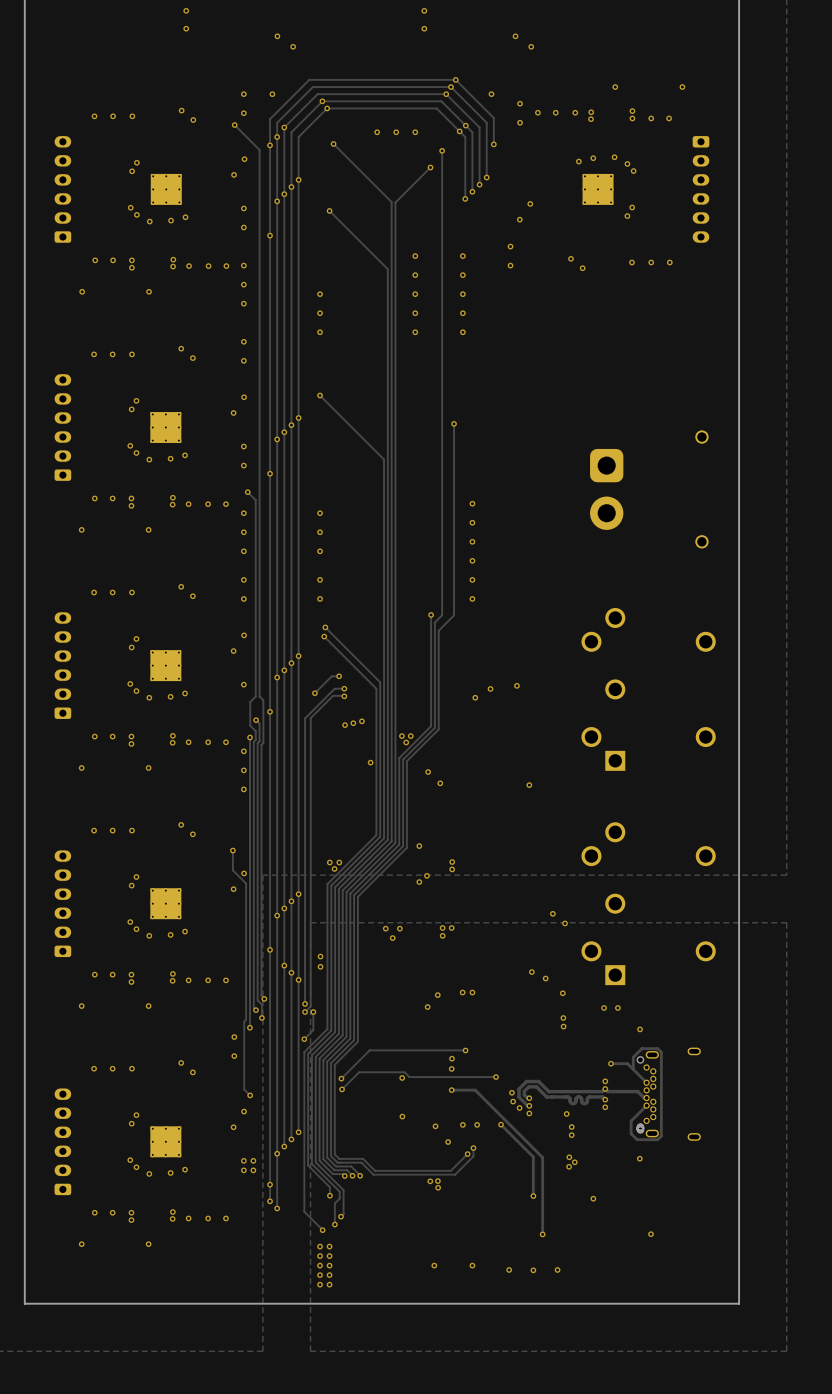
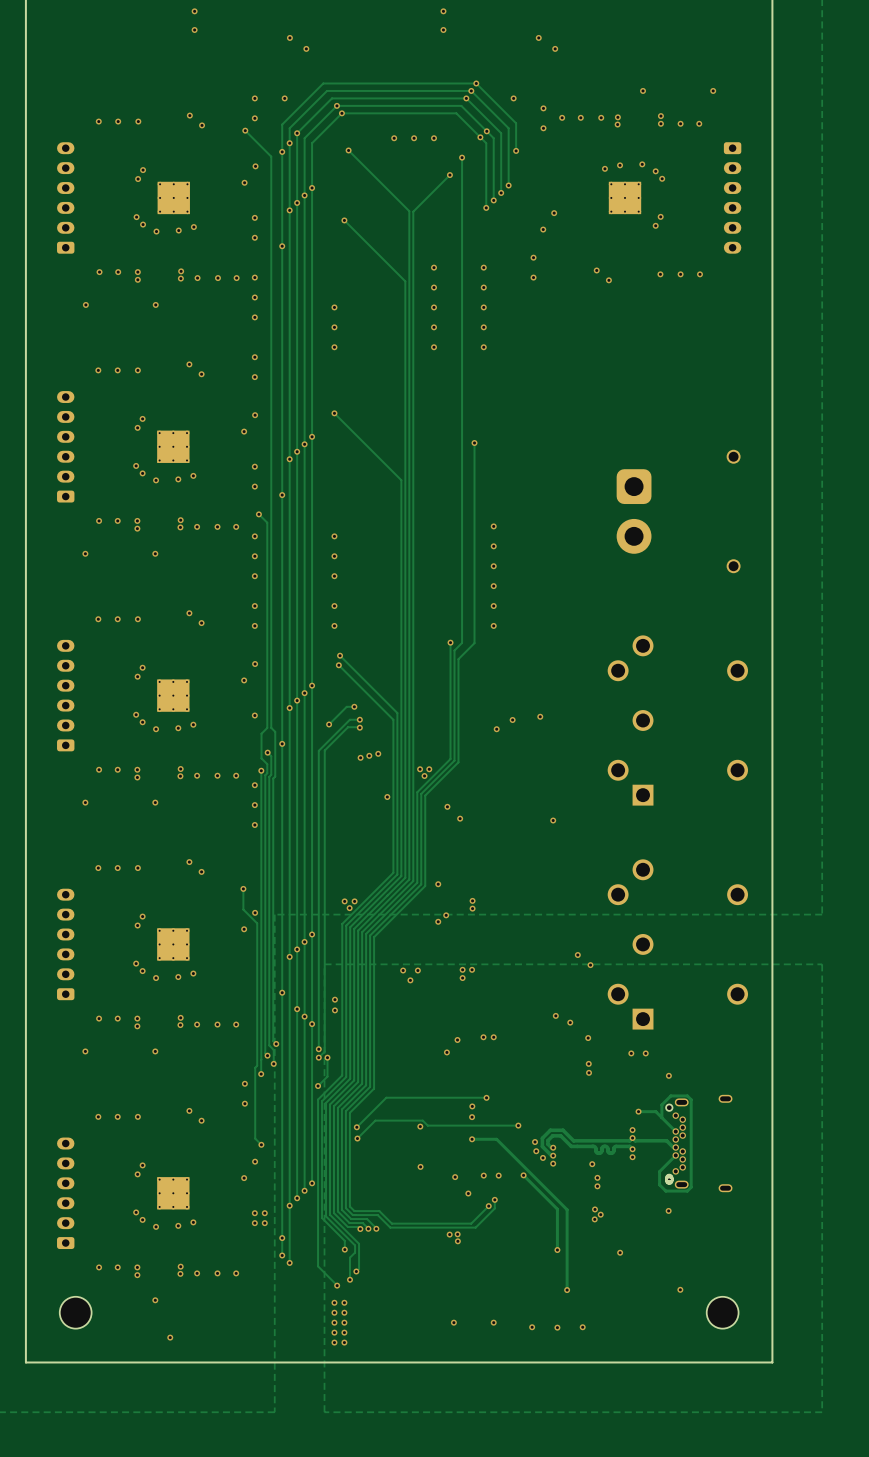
via: (81, 1244) -> none
part: none -> (75, 1312)
part: none -> (722, 1312)
via: none -> (170, 1337)

